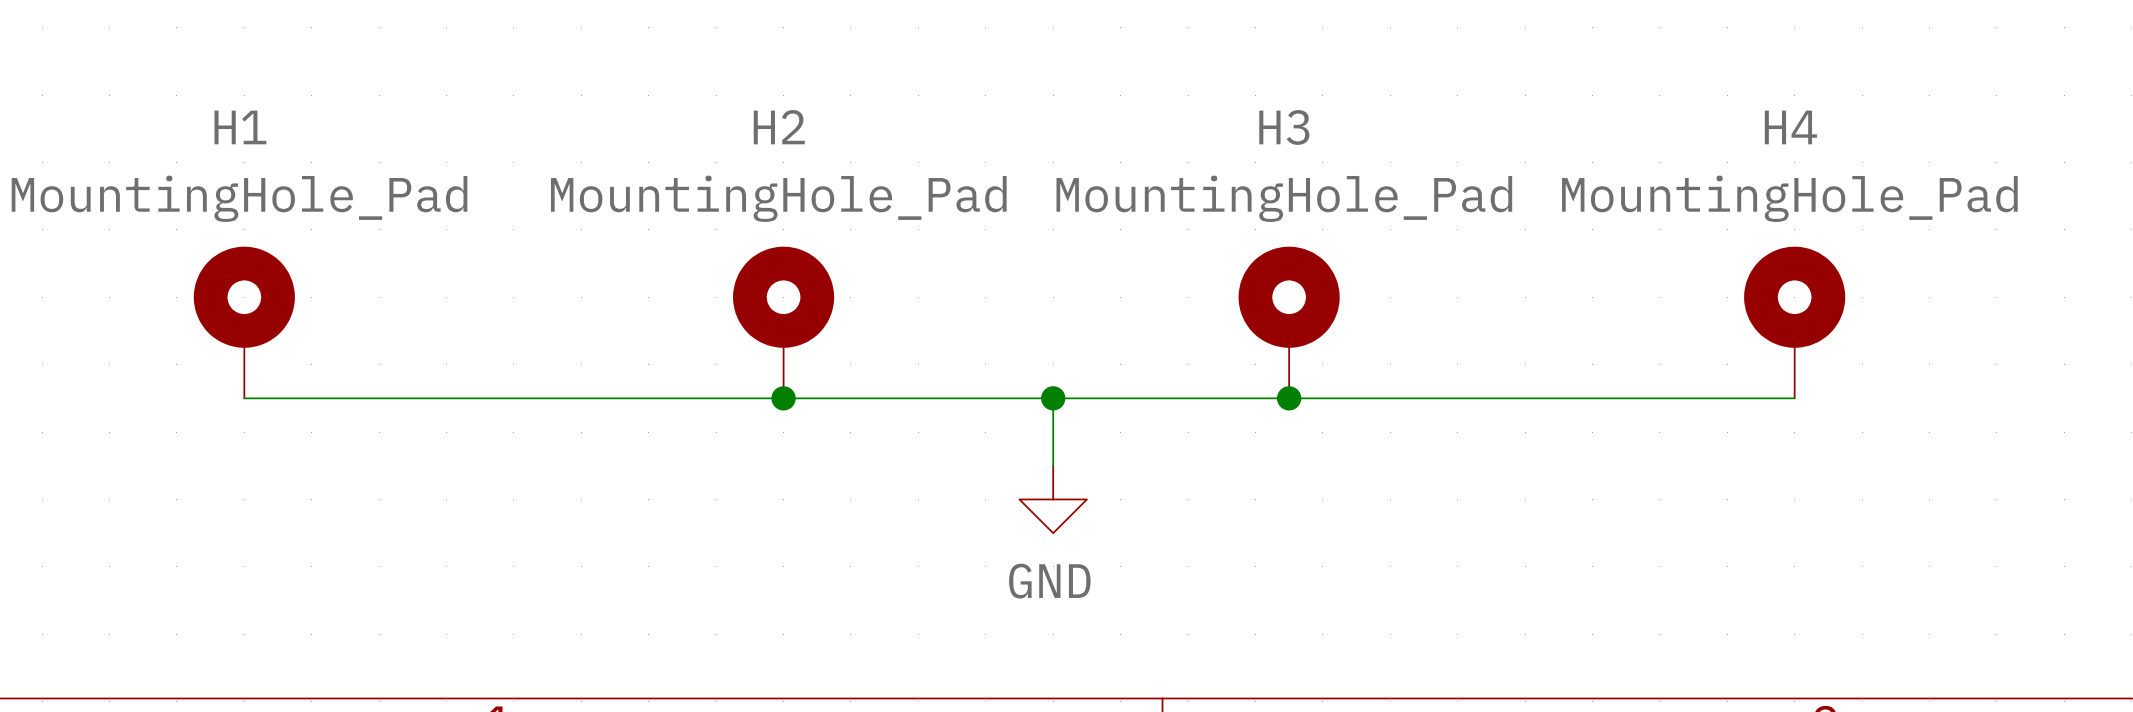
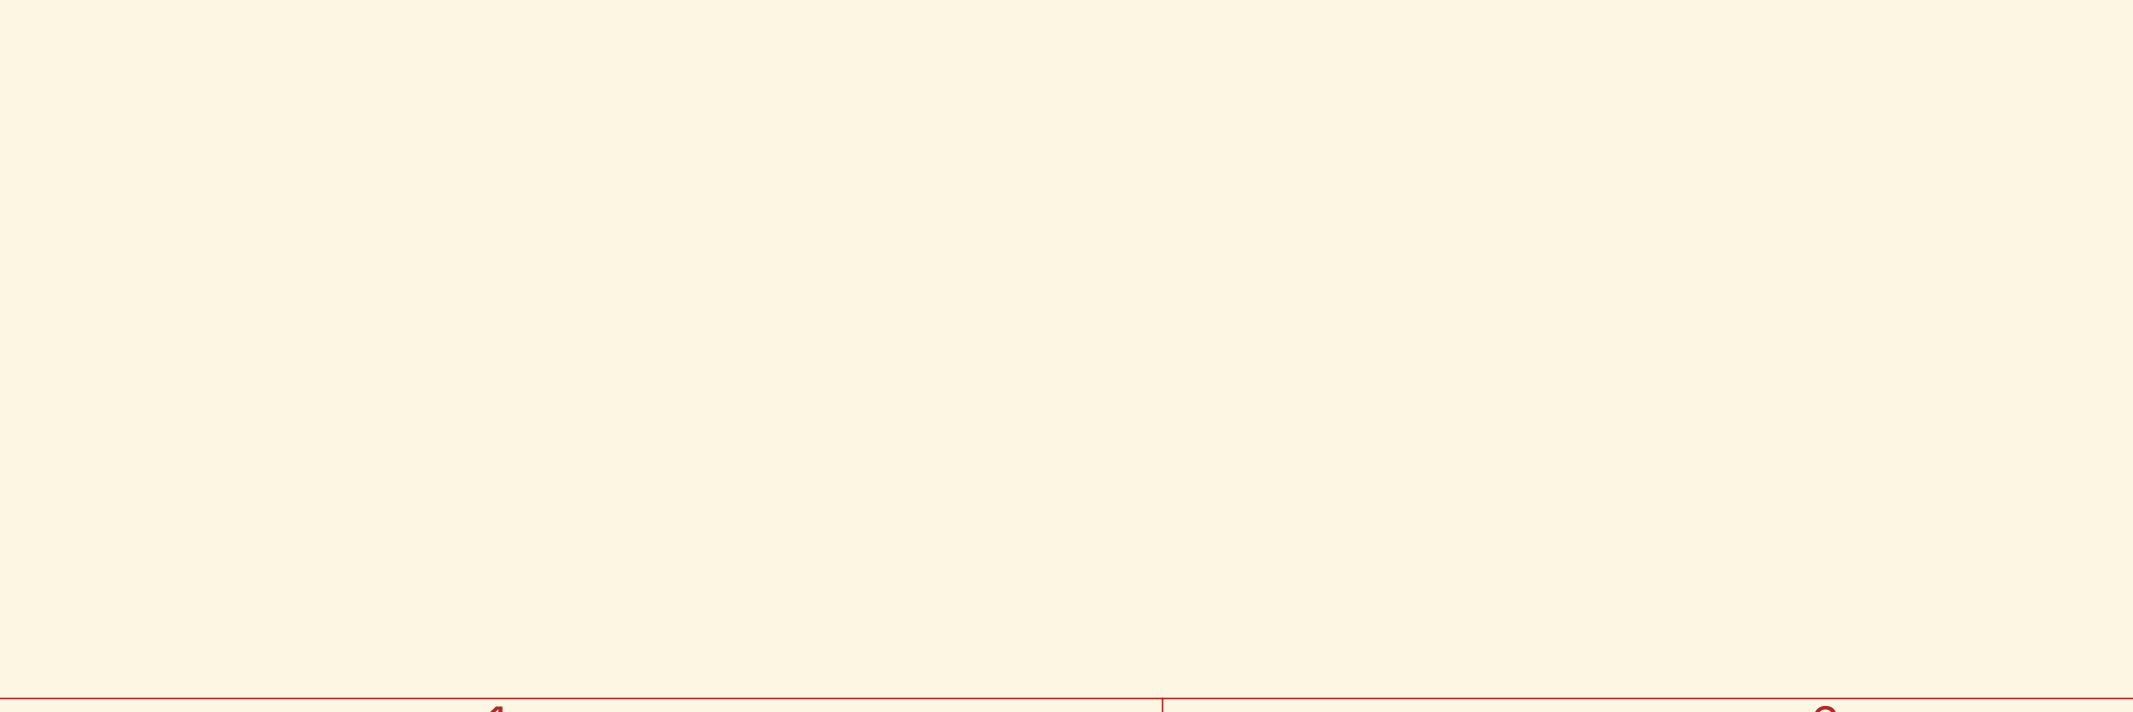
H1: MountingHole_Pad (244, 322) -> none
H2: MountingHole_Pad (783, 322) -> none
H3: MountingHole_Pad (1289, 322) -> none
H4: MountingHole_Pad (1794, 322) -> none
wire: (244, 398) (1794, 398) -> none
junction: (783, 398) -> none
wire: (1053, 398) (1053, 465) -> none
junction: (1053, 398) -> none
junction: (1289, 398) -> none
power symbol: GND (1053, 499) -> none

